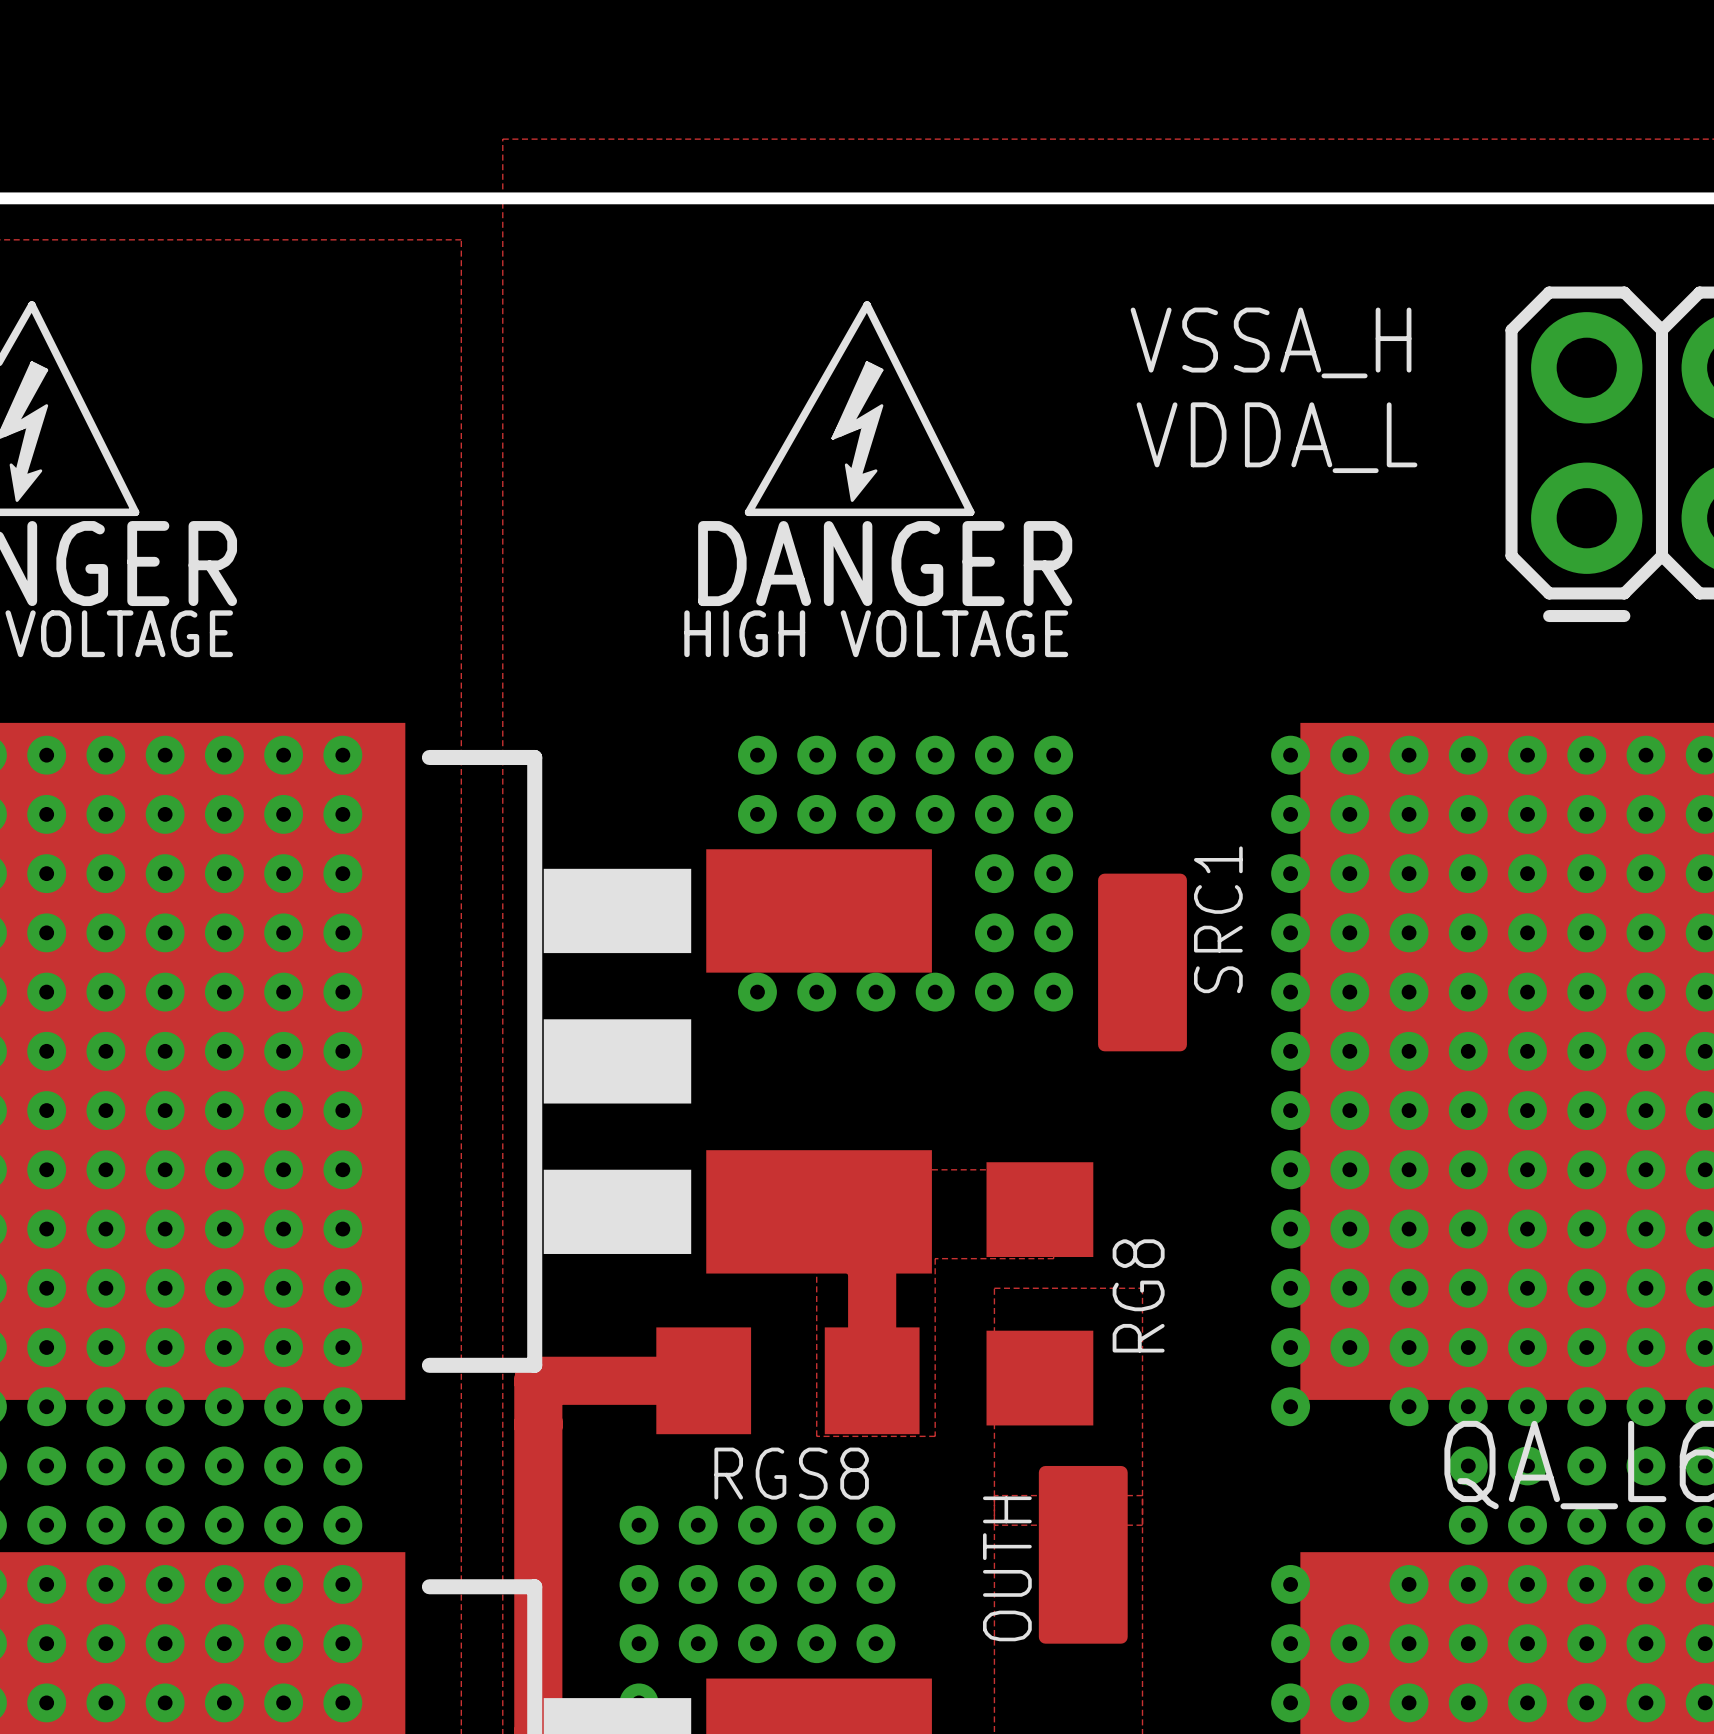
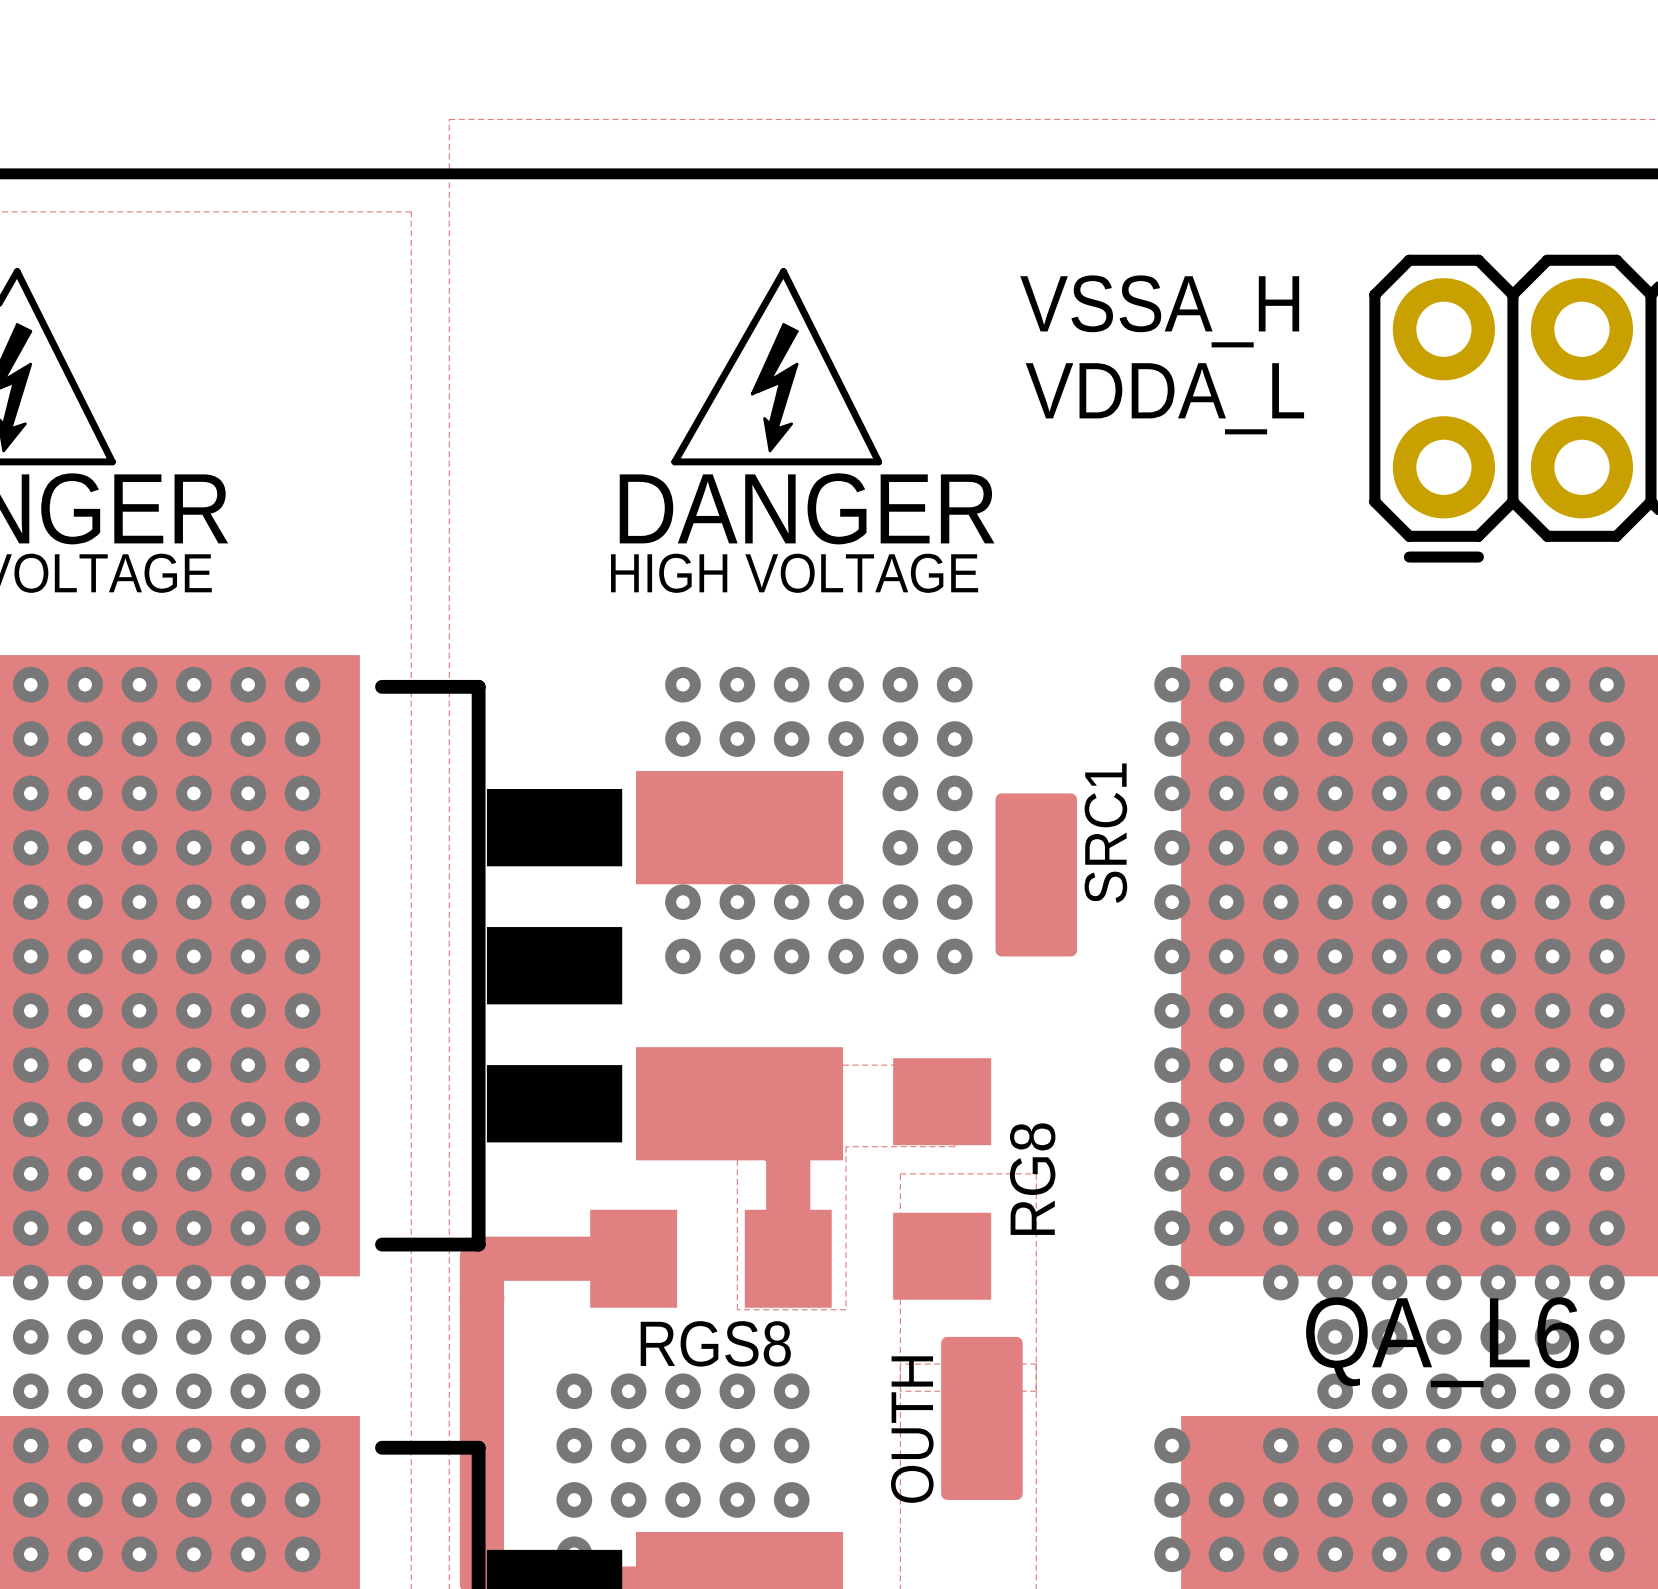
via: none -> (683, 956)
via: none -> (737, 956)
via: none -> (791, 956)
via: none -> (846, 956)
via: none -> (900, 956)
via: none -> (954, 956)

